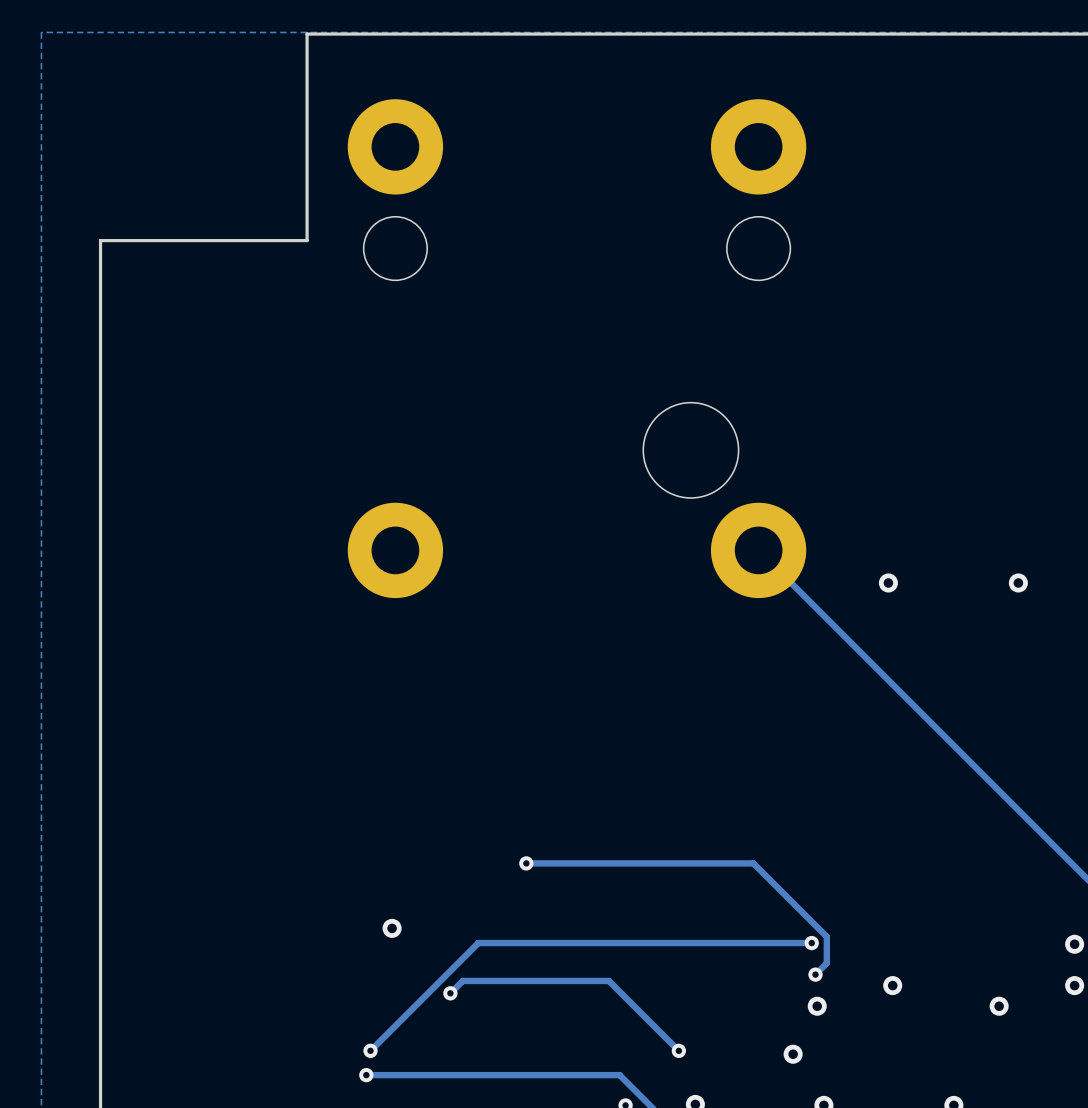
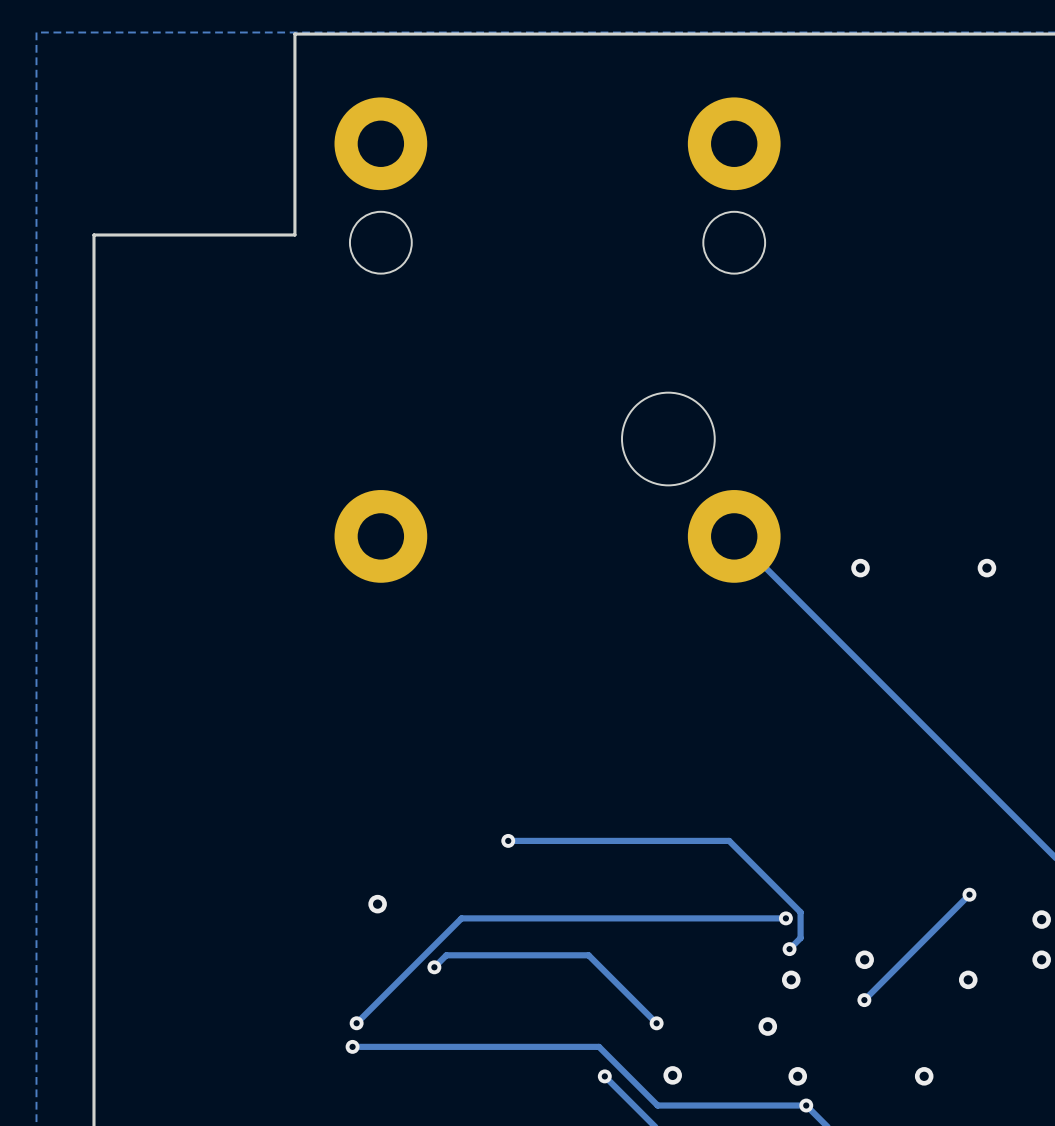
track: none -> (969, 894) (864, 1000)
via: none -> (969, 894)
via: none -> (864, 1000)

